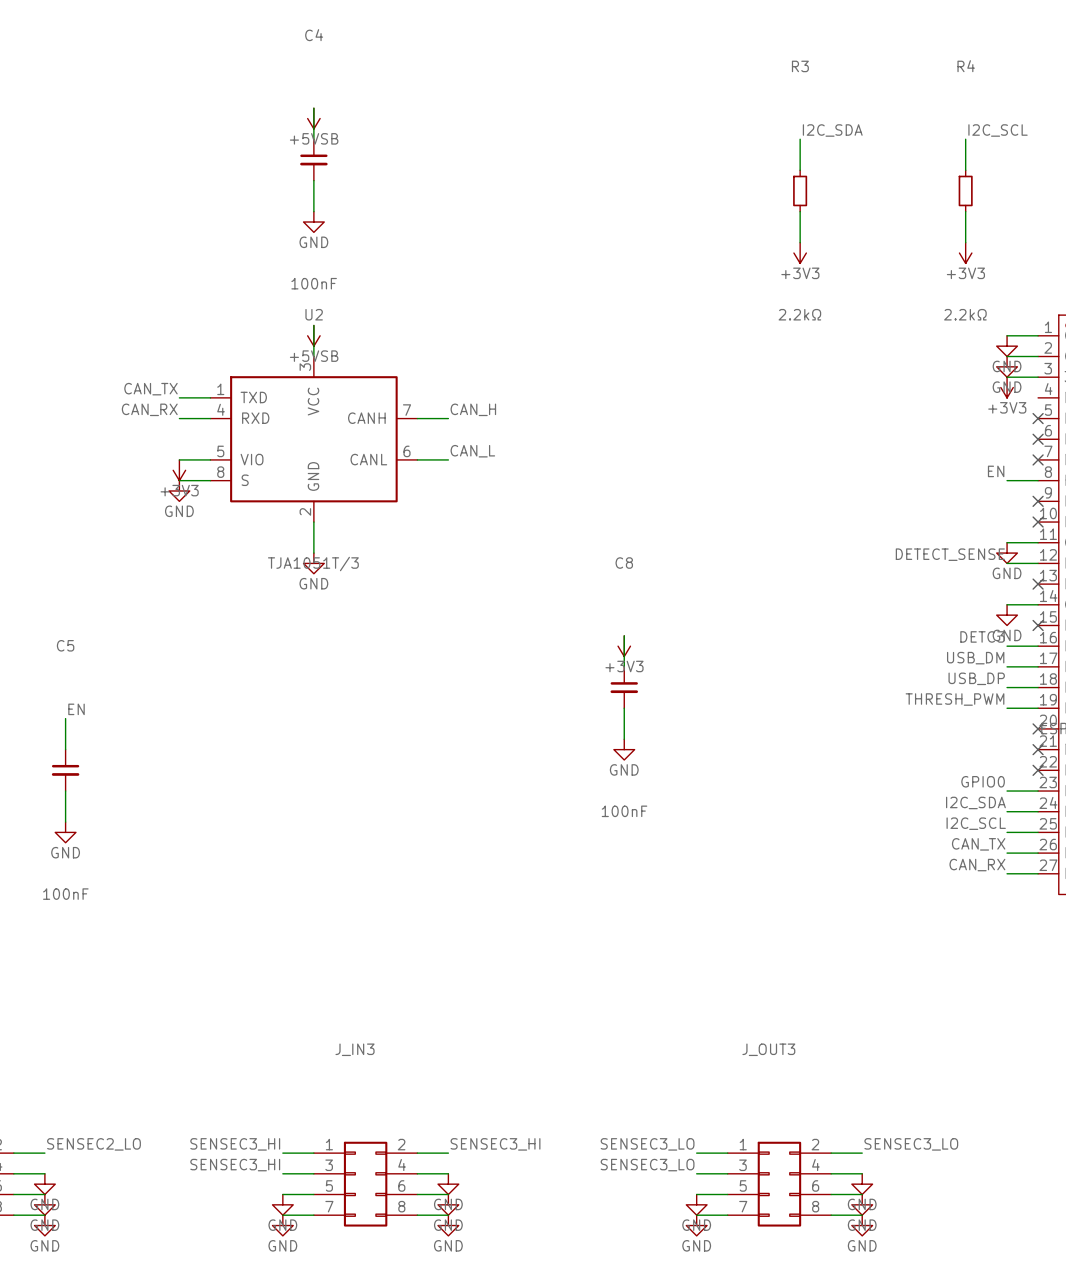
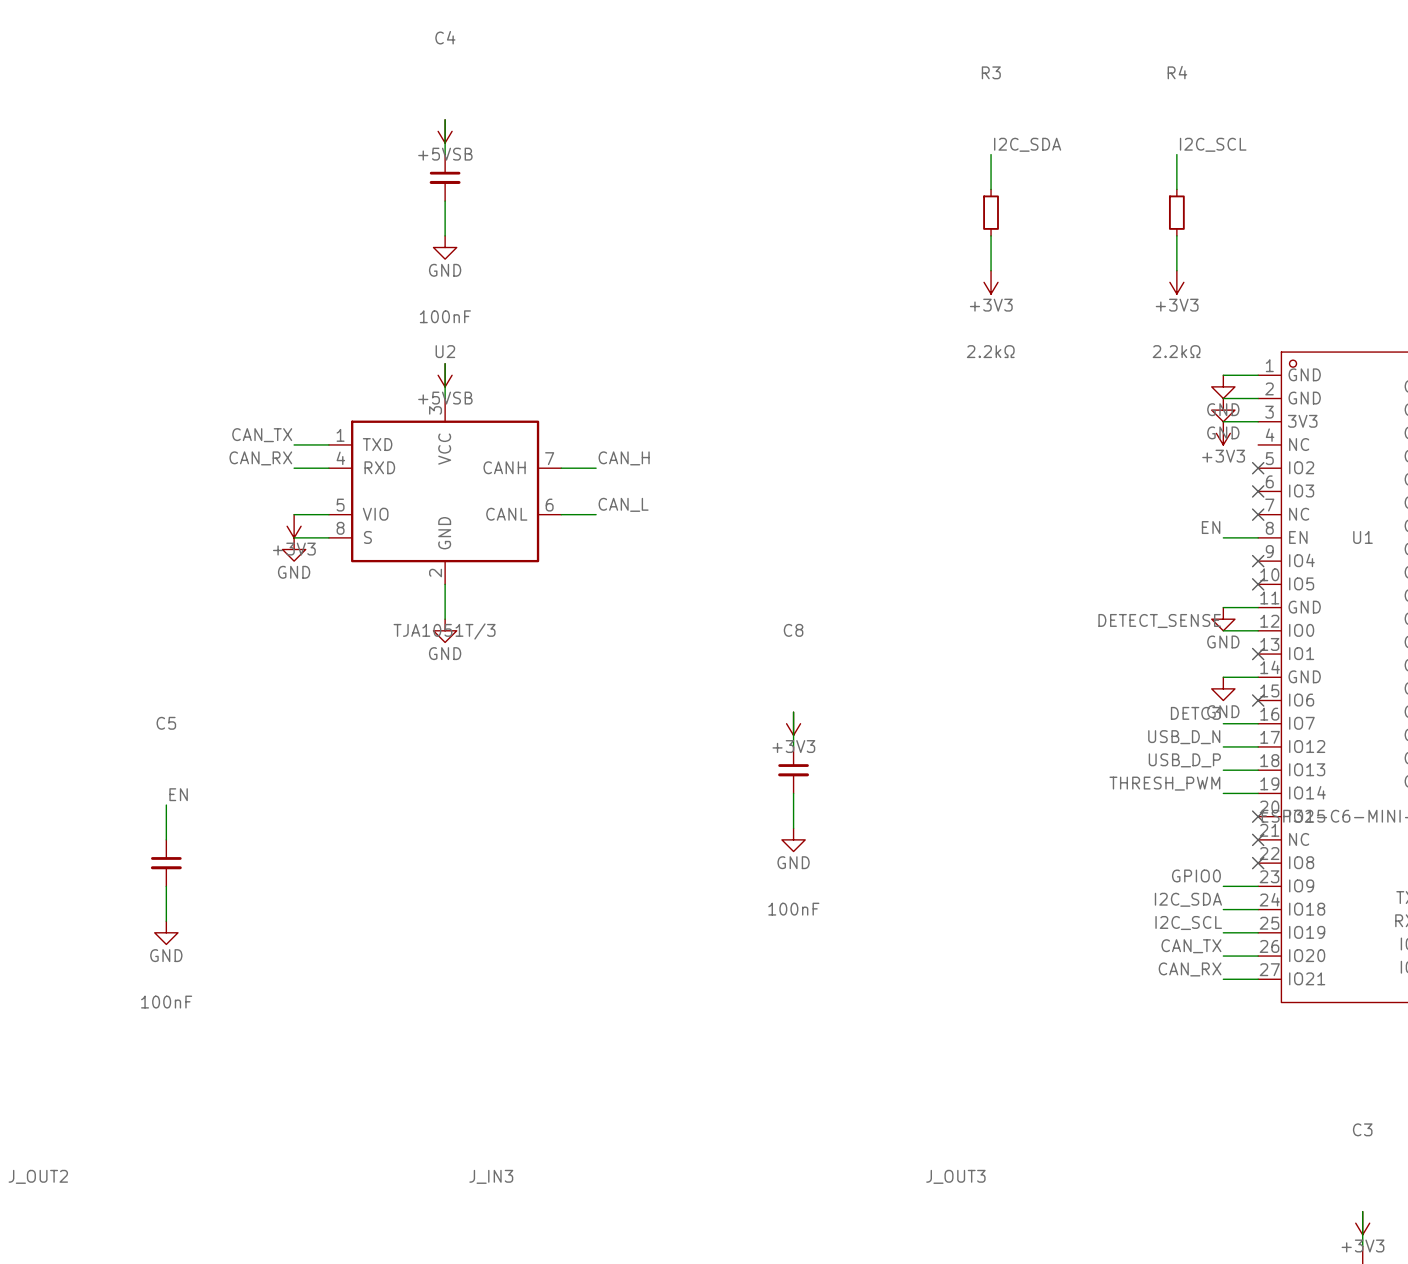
label: USB_DM (975, 658) -> USB_D_N (1184, 737)
label: USB_DP (976, 678) -> USB_D_P (1184, 760)

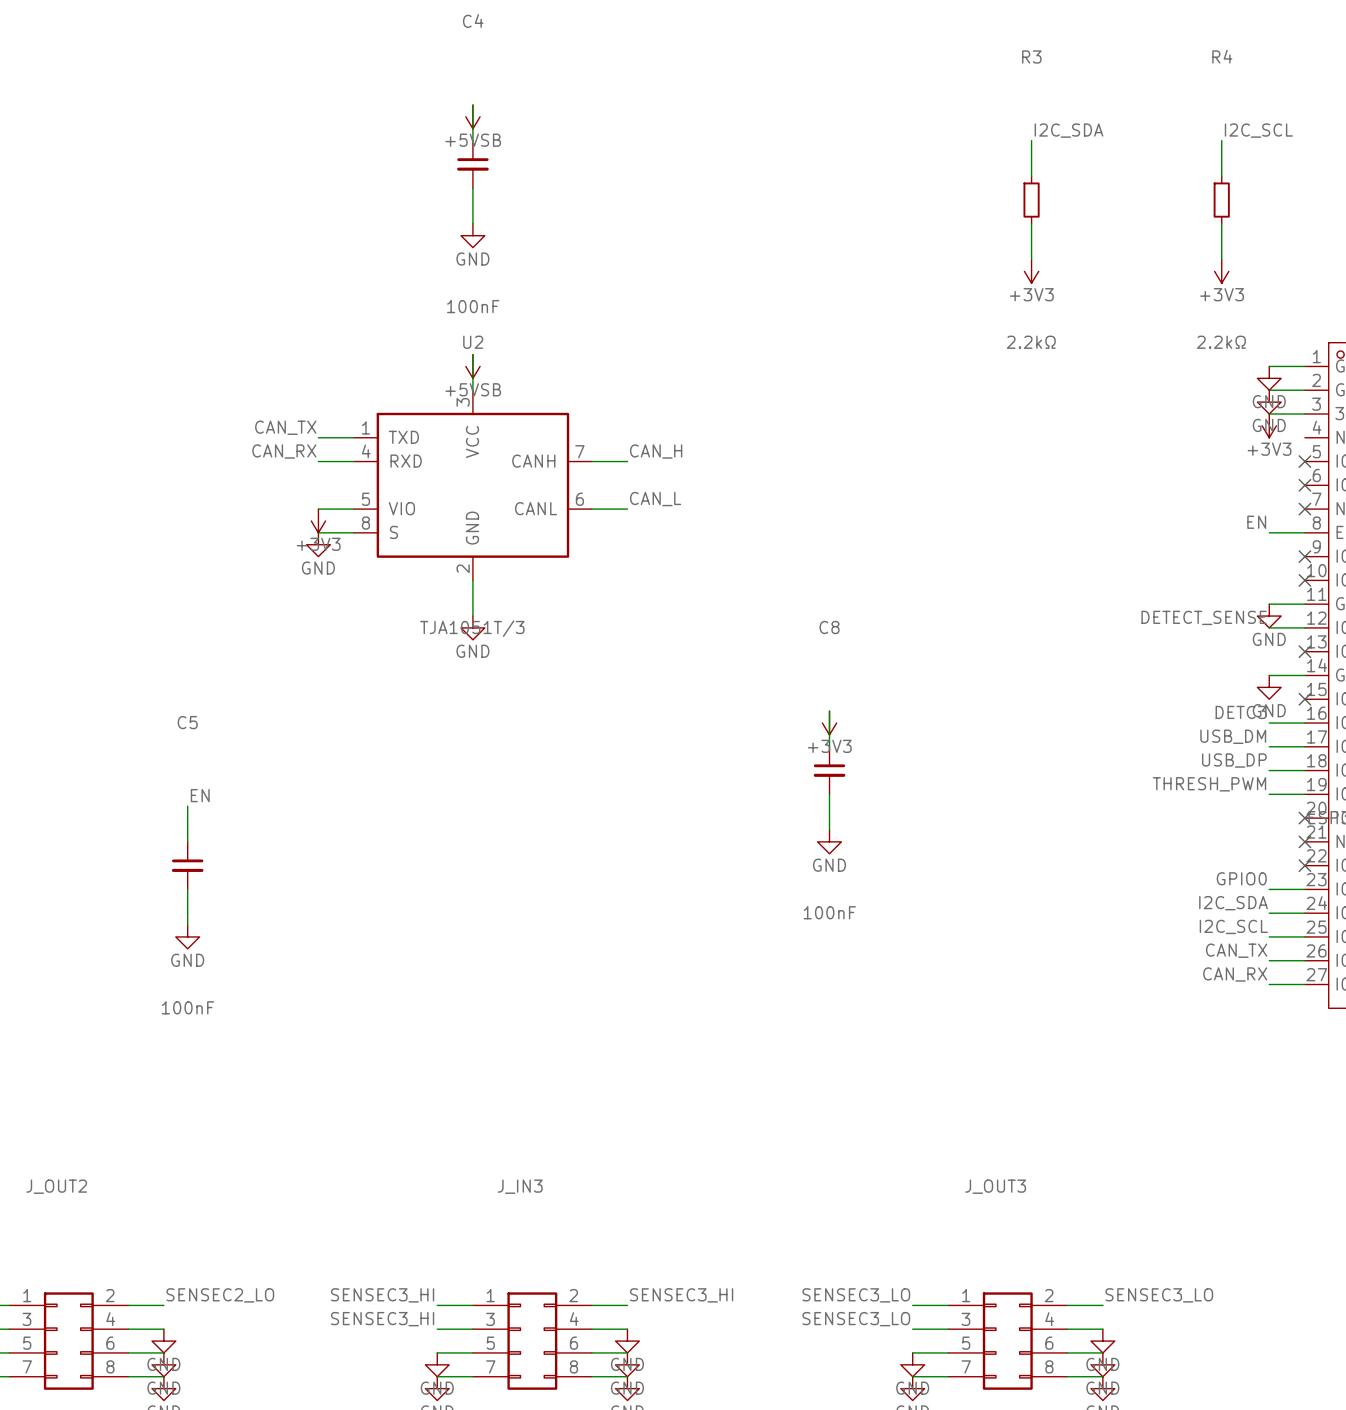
label: USB_D_N (1184, 737) -> USB_DM (1233, 736)
label: USB_D_P (1184, 760) -> USB_DP (1234, 760)

